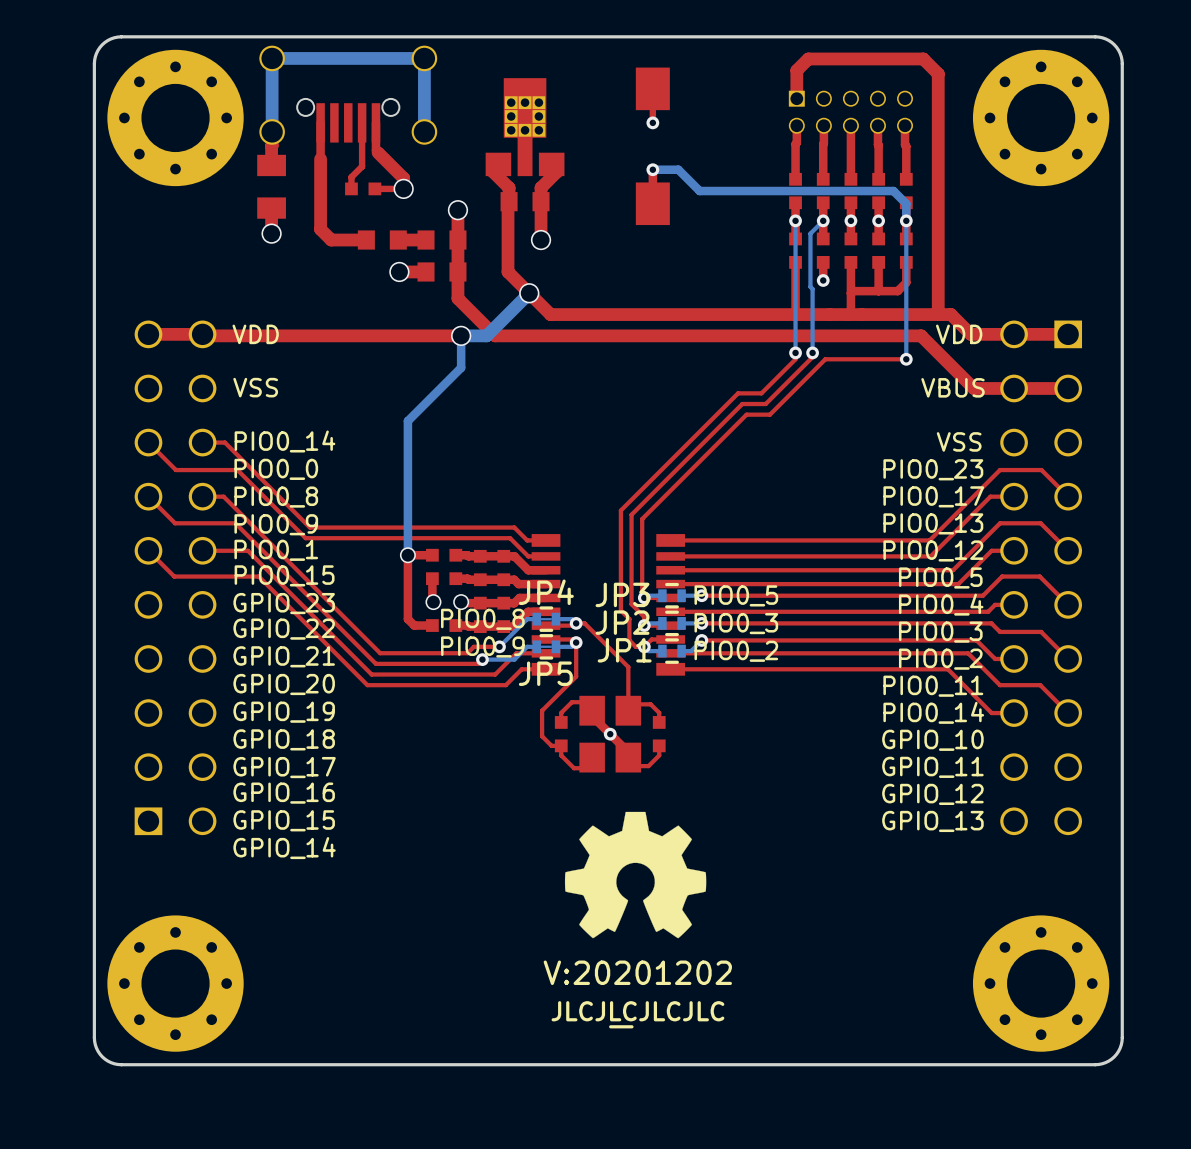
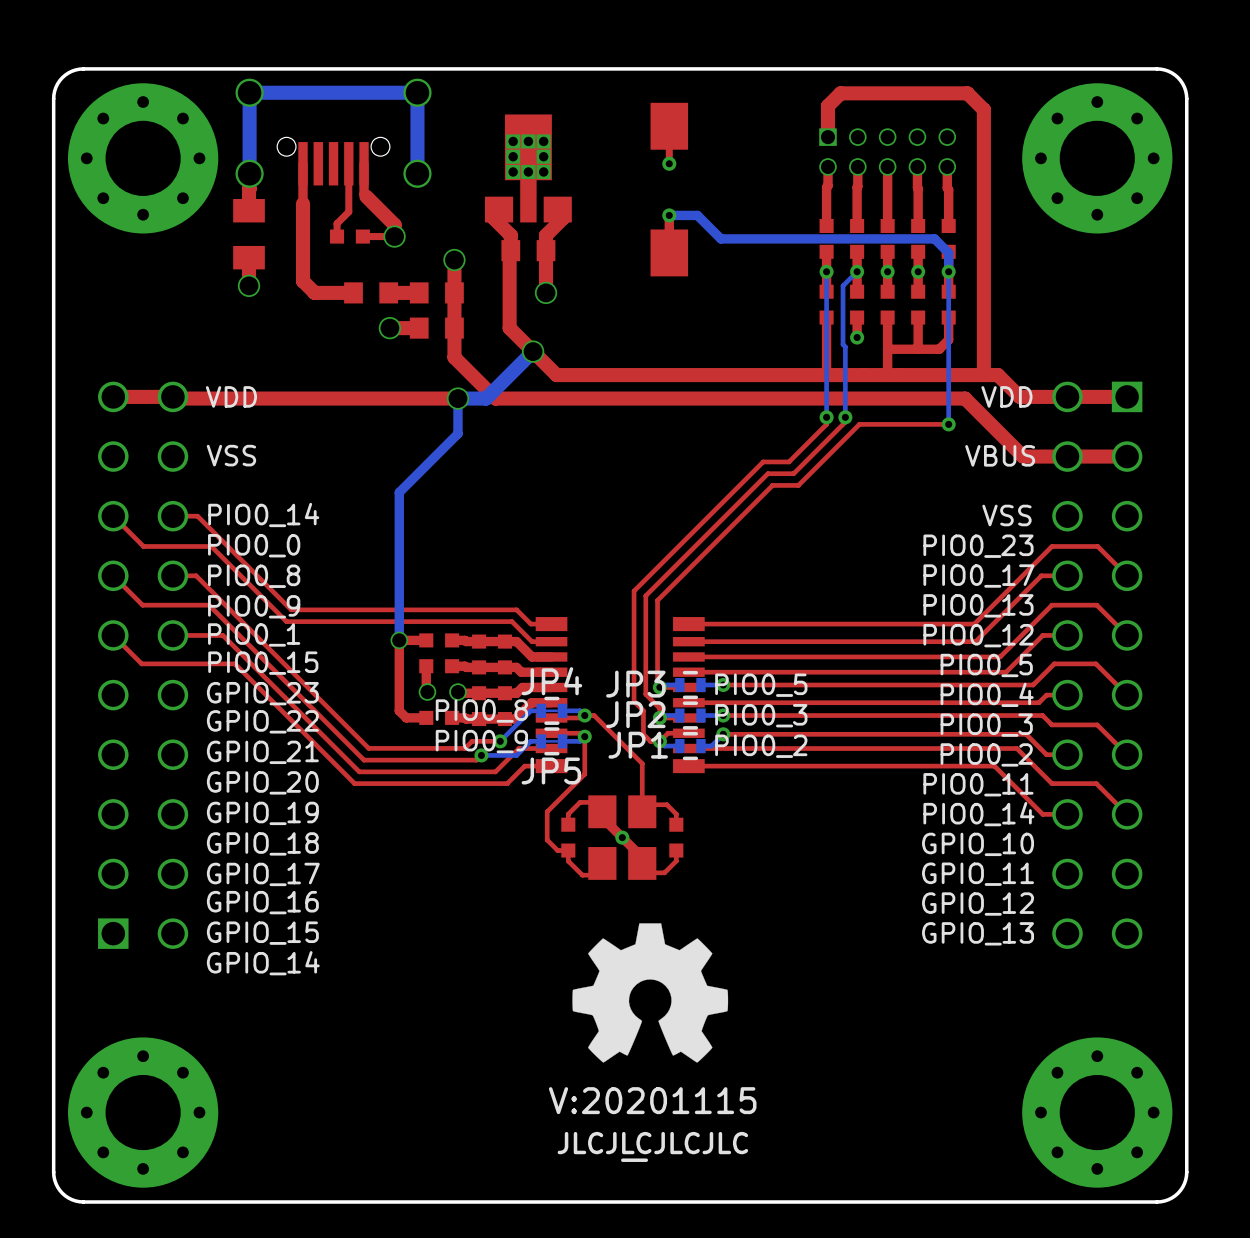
drawing shape: [543, 960, 732, 986] -> [548, 1087, 757, 1115]

